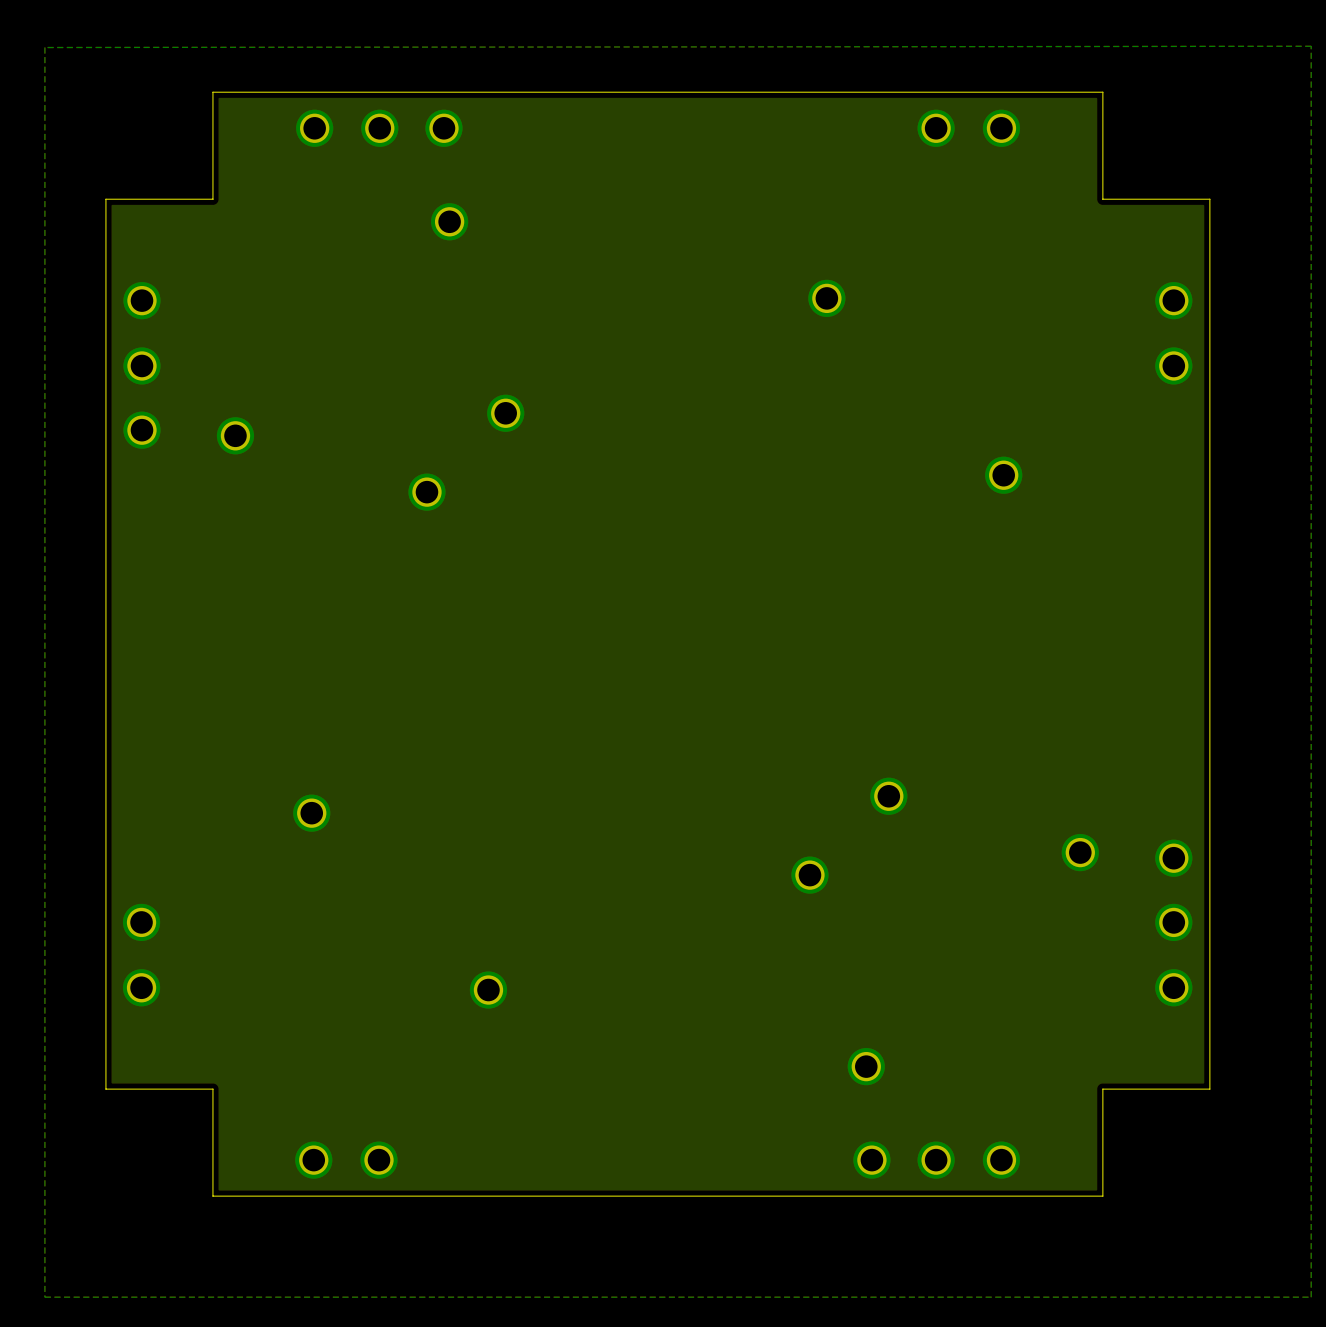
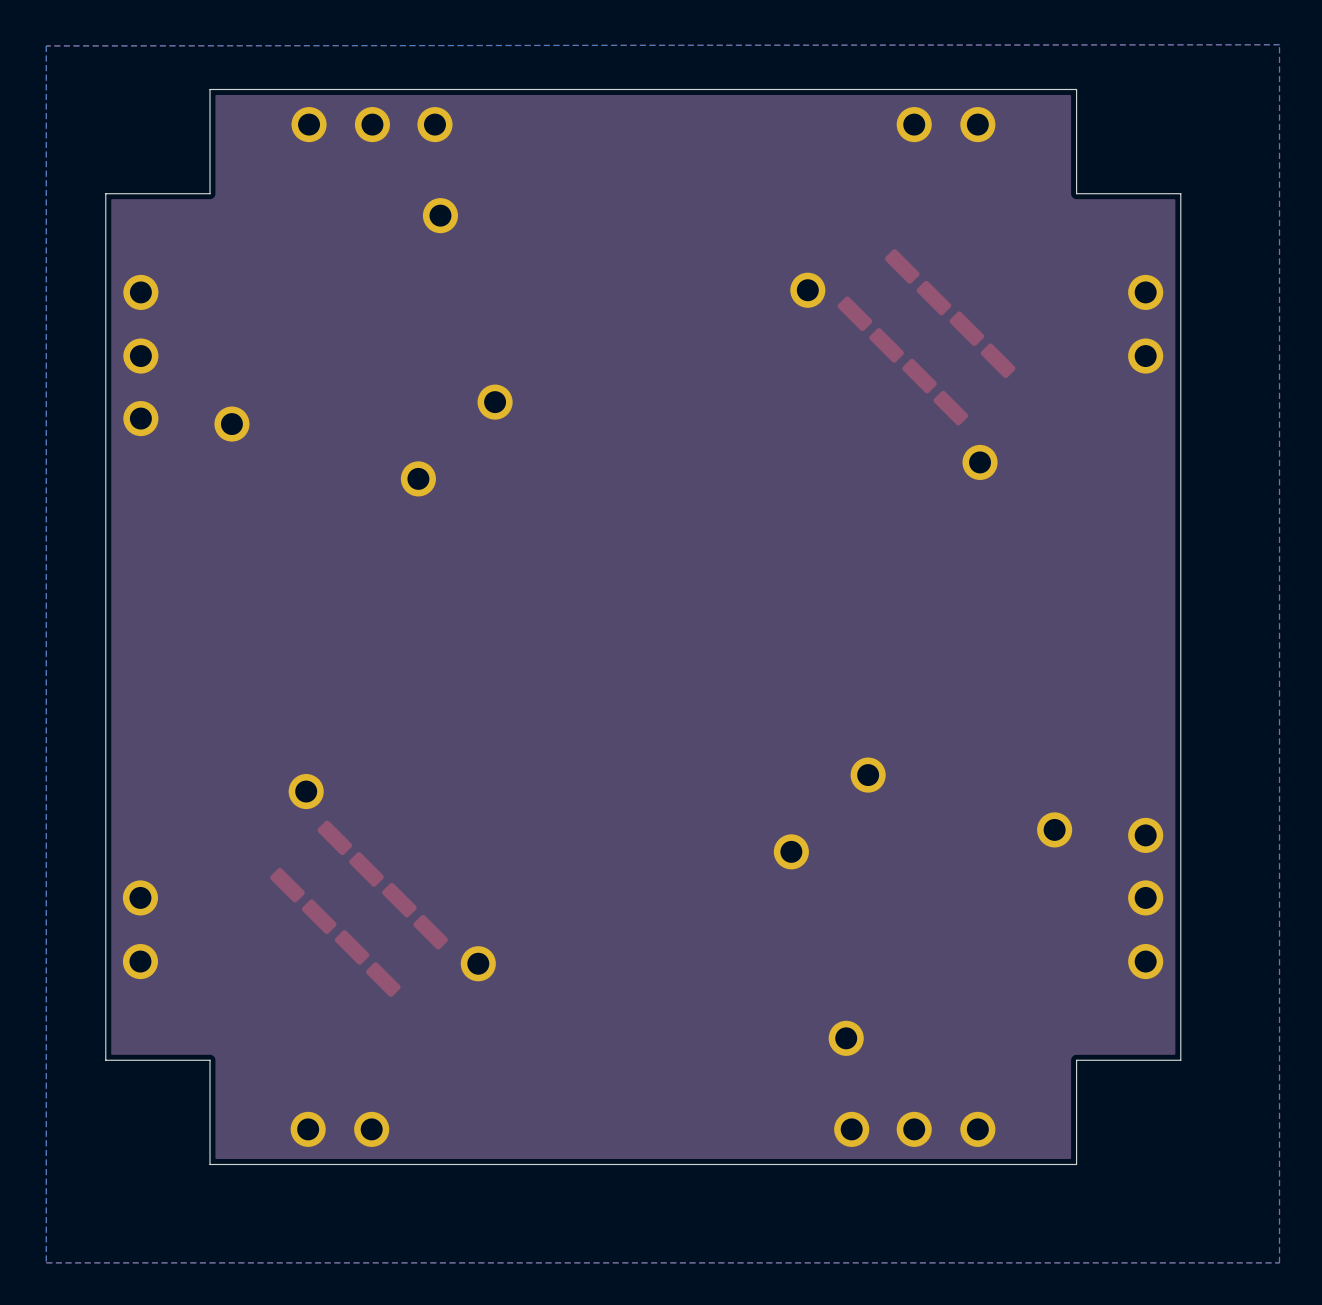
part footprint: [296, 109, 334, 147] -> [291, 107, 327, 143]
part footprint: [361, 109, 399, 147] -> [354, 107, 391, 143]
part footprint: [425, 109, 463, 147] -> [417, 107, 453, 143]
part footprint: [917, 109, 955, 147] -> [896, 107, 932, 143]
part footprint: [982, 109, 1021, 147] -> [960, 107, 996, 143]
part footprint: [431, 203, 469, 241] -> [422, 198, 459, 234]
part footprint: [808, 279, 846, 317] -> [790, 272, 826, 308]
part footprint: [123, 282, 161, 320] -> [123, 274, 159, 310]
part footprint: [1155, 282, 1193, 320] -> [1128, 274, 1164, 310]
part: none -> (878, 290)
part: none -> (910, 321)
part footprint: [123, 347, 161, 385] -> [123, 338, 159, 374]
part footprint: [1155, 347, 1193, 385] -> [1128, 338, 1164, 374]
part: none -> (943, 352)
part footprint: [487, 394, 525, 432] -> [477, 384, 513, 420]
part: none -> (974, 384)
part footprint: [123, 411, 161, 449] -> [123, 401, 159, 437]
part footprint: [216, 417, 255, 455] -> [214, 406, 250, 442]
part footprint: [985, 456, 1023, 494] -> [962, 444, 998, 481]
part footprint: [408, 473, 446, 511] -> [400, 461, 436, 497]
part footprint: [870, 777, 908, 815] -> [850, 757, 886, 793]
part footprint: [293, 794, 331, 832] -> [288, 773, 324, 810]
part footprint: [1061, 834, 1099, 872] -> [1037, 812, 1073, 848]
part footprint: [1155, 839, 1193, 877] -> [1128, 817, 1164, 853]
part footprint: [791, 856, 829, 894] -> [773, 834, 809, 870]
part: none -> (311, 861)
part footprint: [122, 903, 161, 942] -> [122, 880, 159, 916]
part footprint: [1155, 903, 1193, 942] -> [1128, 880, 1164, 916]
part: none -> (342, 893)
part: none -> (375, 923)
part footprint: [122, 969, 161, 1007] -> [122, 944, 159, 980]
part footprint: [1155, 969, 1193, 1007] -> [1128, 944, 1164, 980]
part footprint: [469, 971, 508, 1009] -> [460, 946, 496, 982]
part: none -> (407, 955)
part footprint: [847, 1048, 885, 1086] -> [828, 1020, 864, 1056]
part footprint: [295, 1141, 333, 1179] -> [290, 1111, 326, 1147]
part footprint: [360, 1141, 398, 1179] -> [354, 1111, 390, 1147]
part footprint: [853, 1141, 891, 1179] -> [834, 1111, 870, 1147]
part footprint: [917, 1141, 955, 1179] -> [896, 1111, 932, 1147]
part footprint: [982, 1141, 1021, 1179] -> [960, 1111, 996, 1147]

